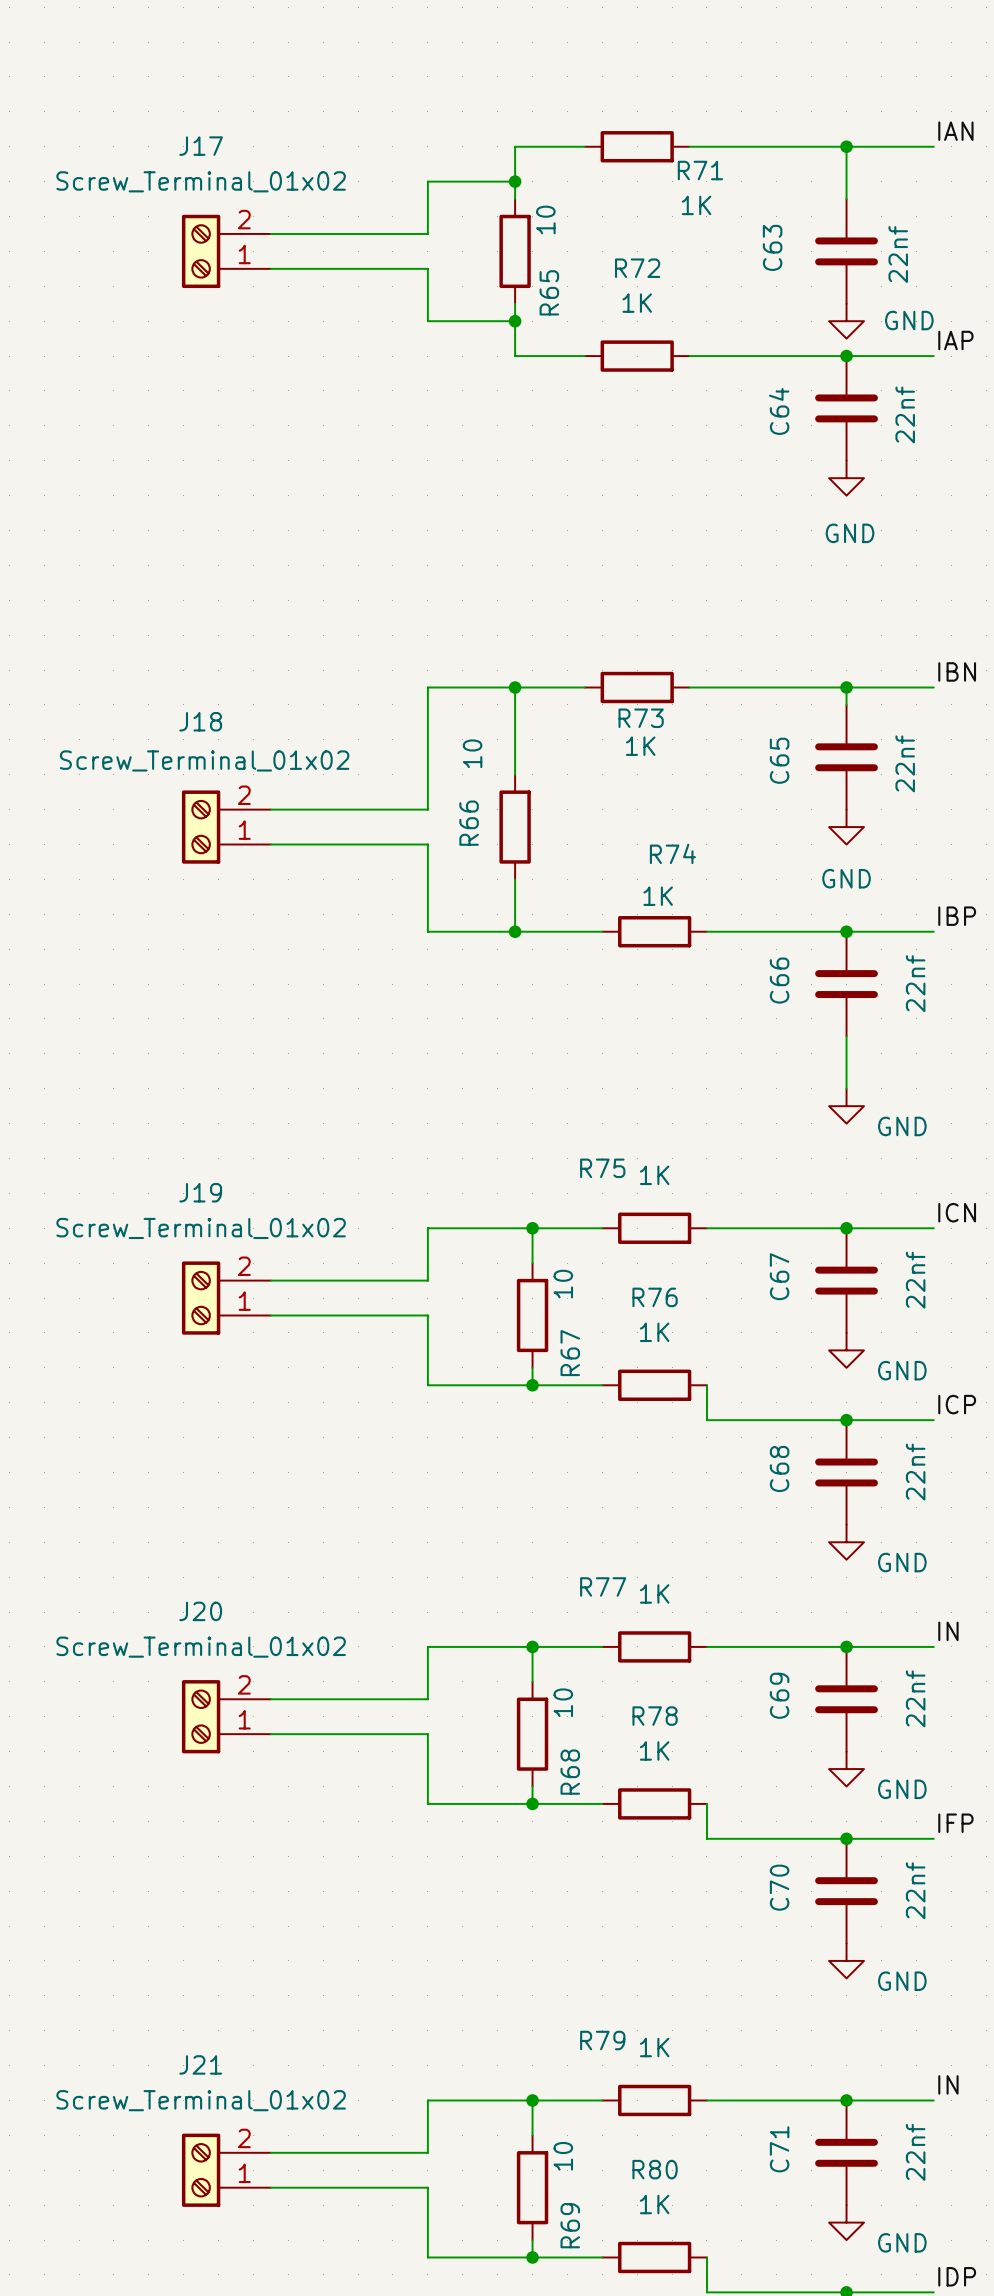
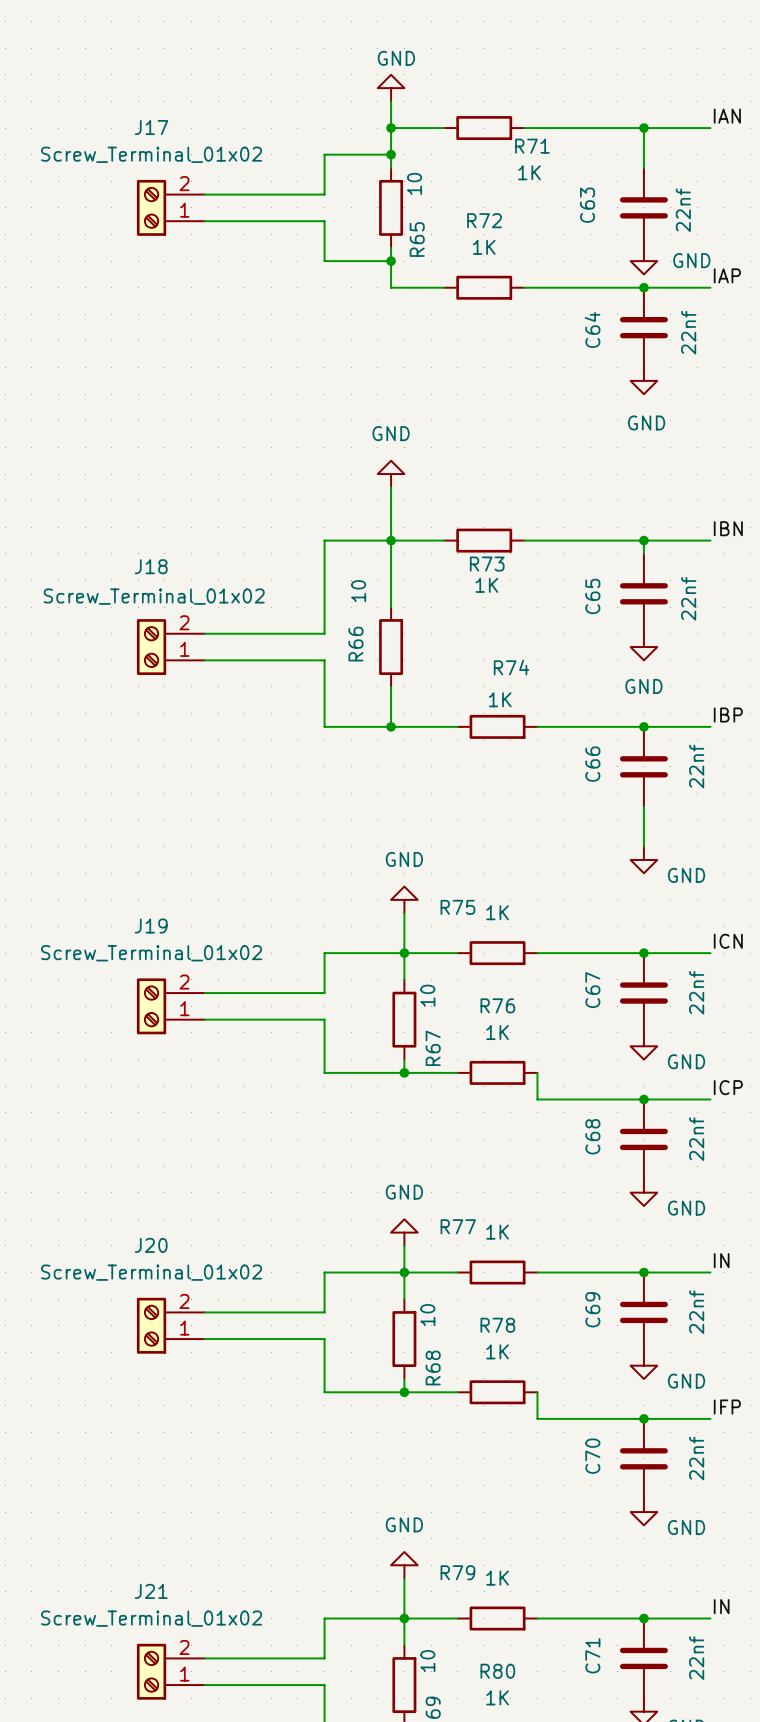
power symbol: none -> GND (391, 88)
wire: none -> (391, 101) (391, 128)
junction: none -> (391, 128)
power symbol: none -> GND (391, 474)
wire: none -> (391, 487) (391, 540)
power symbol: none -> GND (404, 899)
wire: none -> (404, 913) (404, 953)
power symbol: none -> GND (404, 1232)
wire: none -> (404, 1245) (404, 1272)
power symbol: none -> GND (404, 1565)
wire: none -> (404, 1578) (404, 1618)

